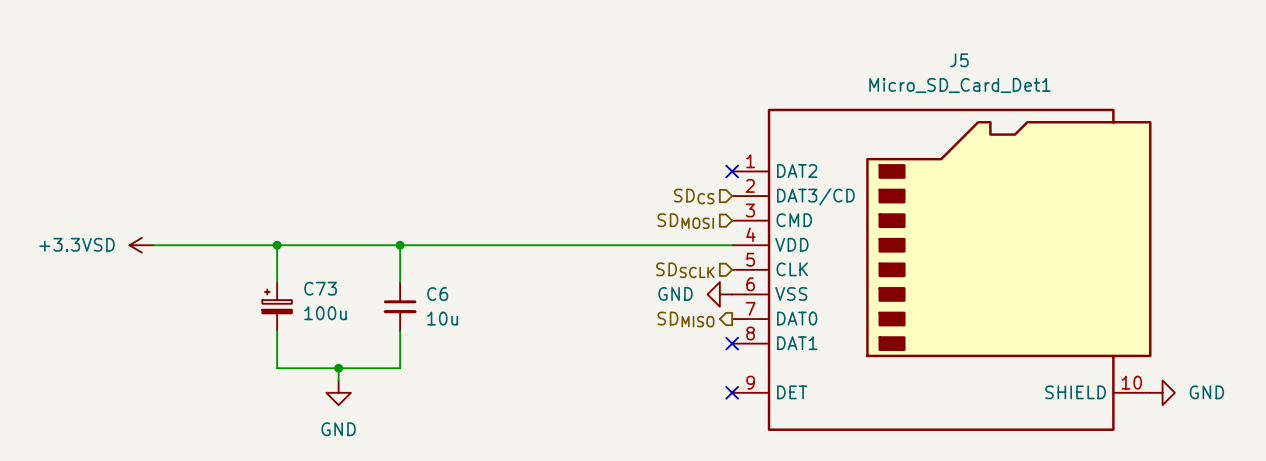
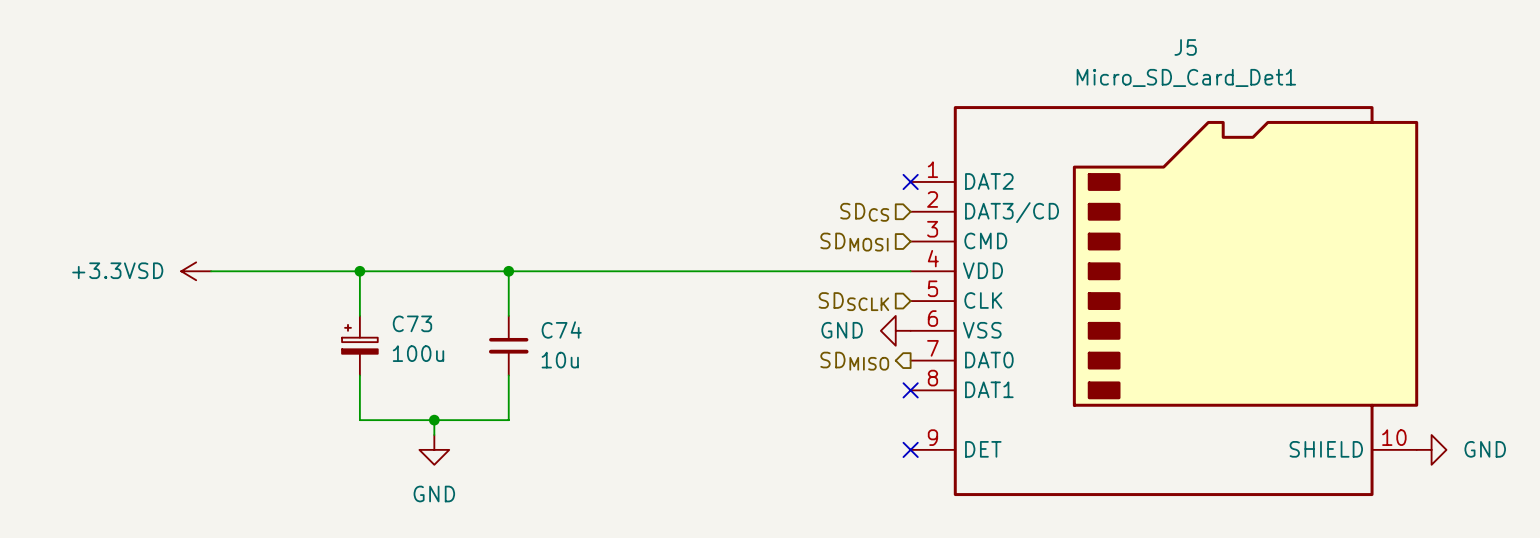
C6 name: C6 (437, 294) -> C74 (561, 329)

